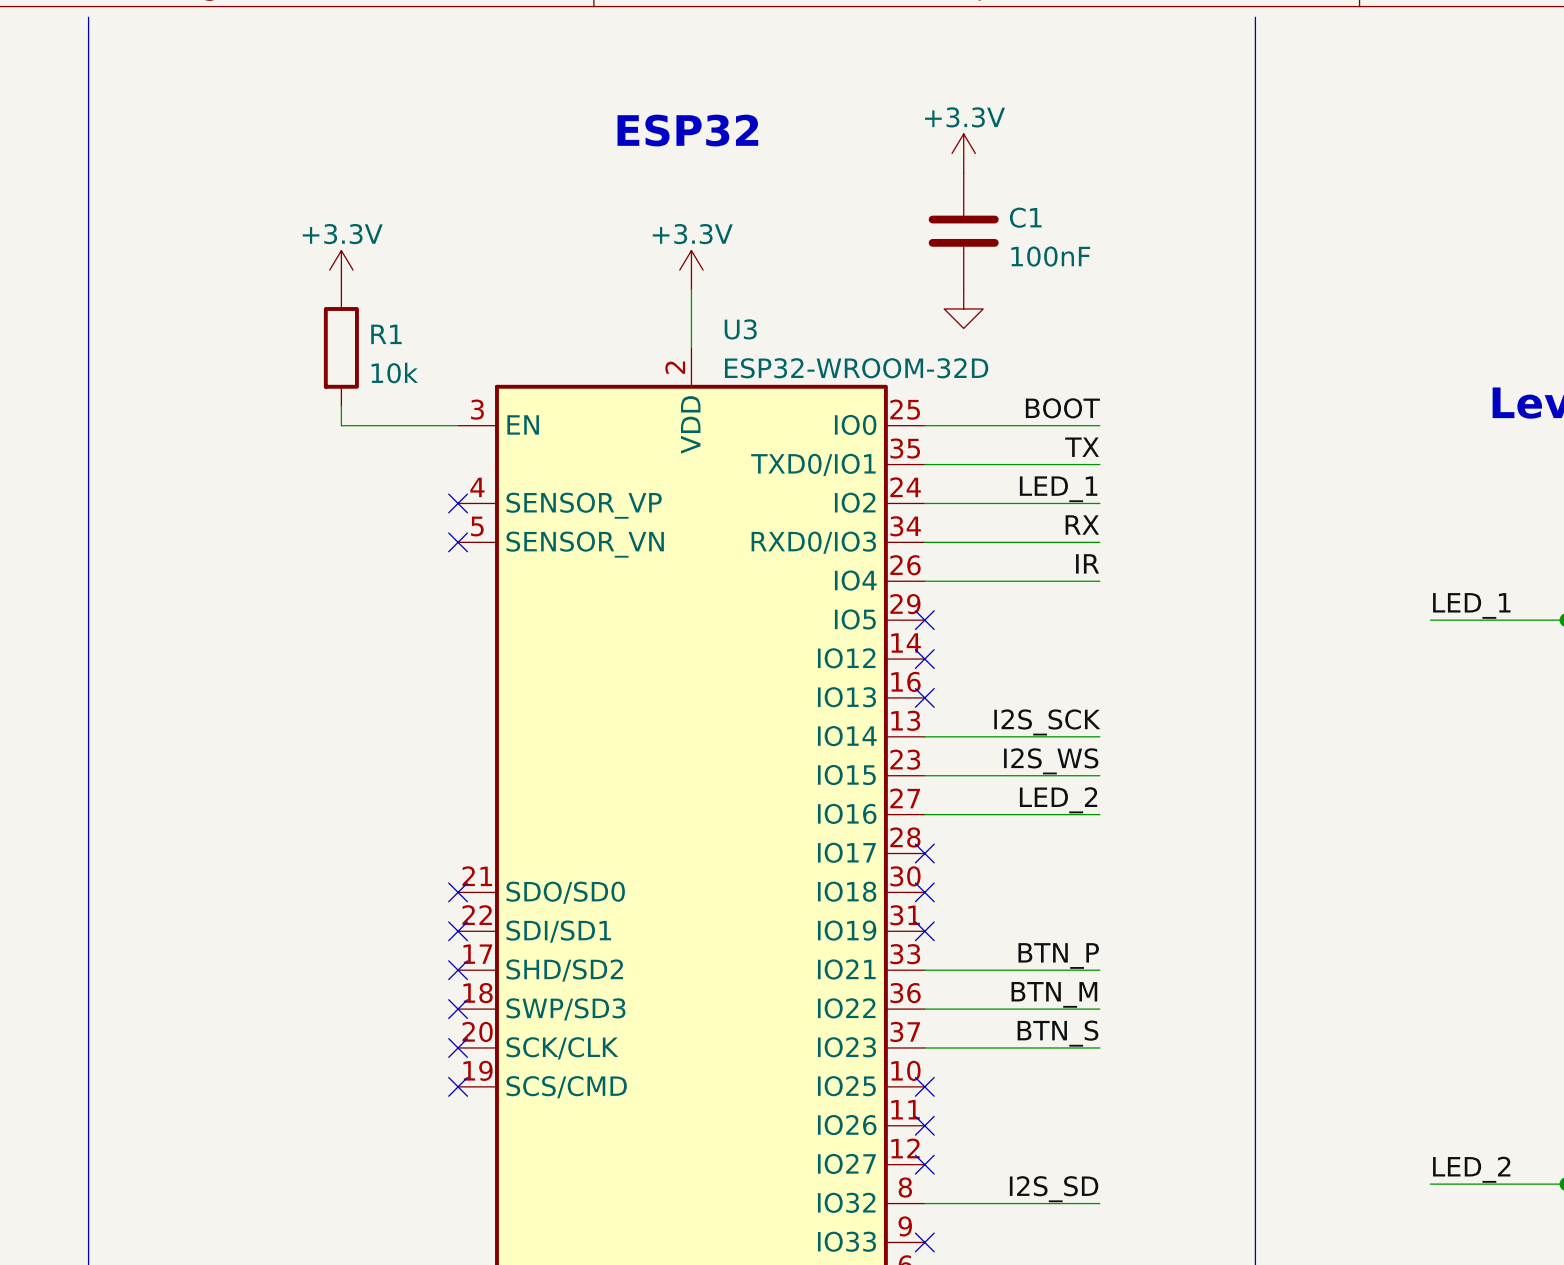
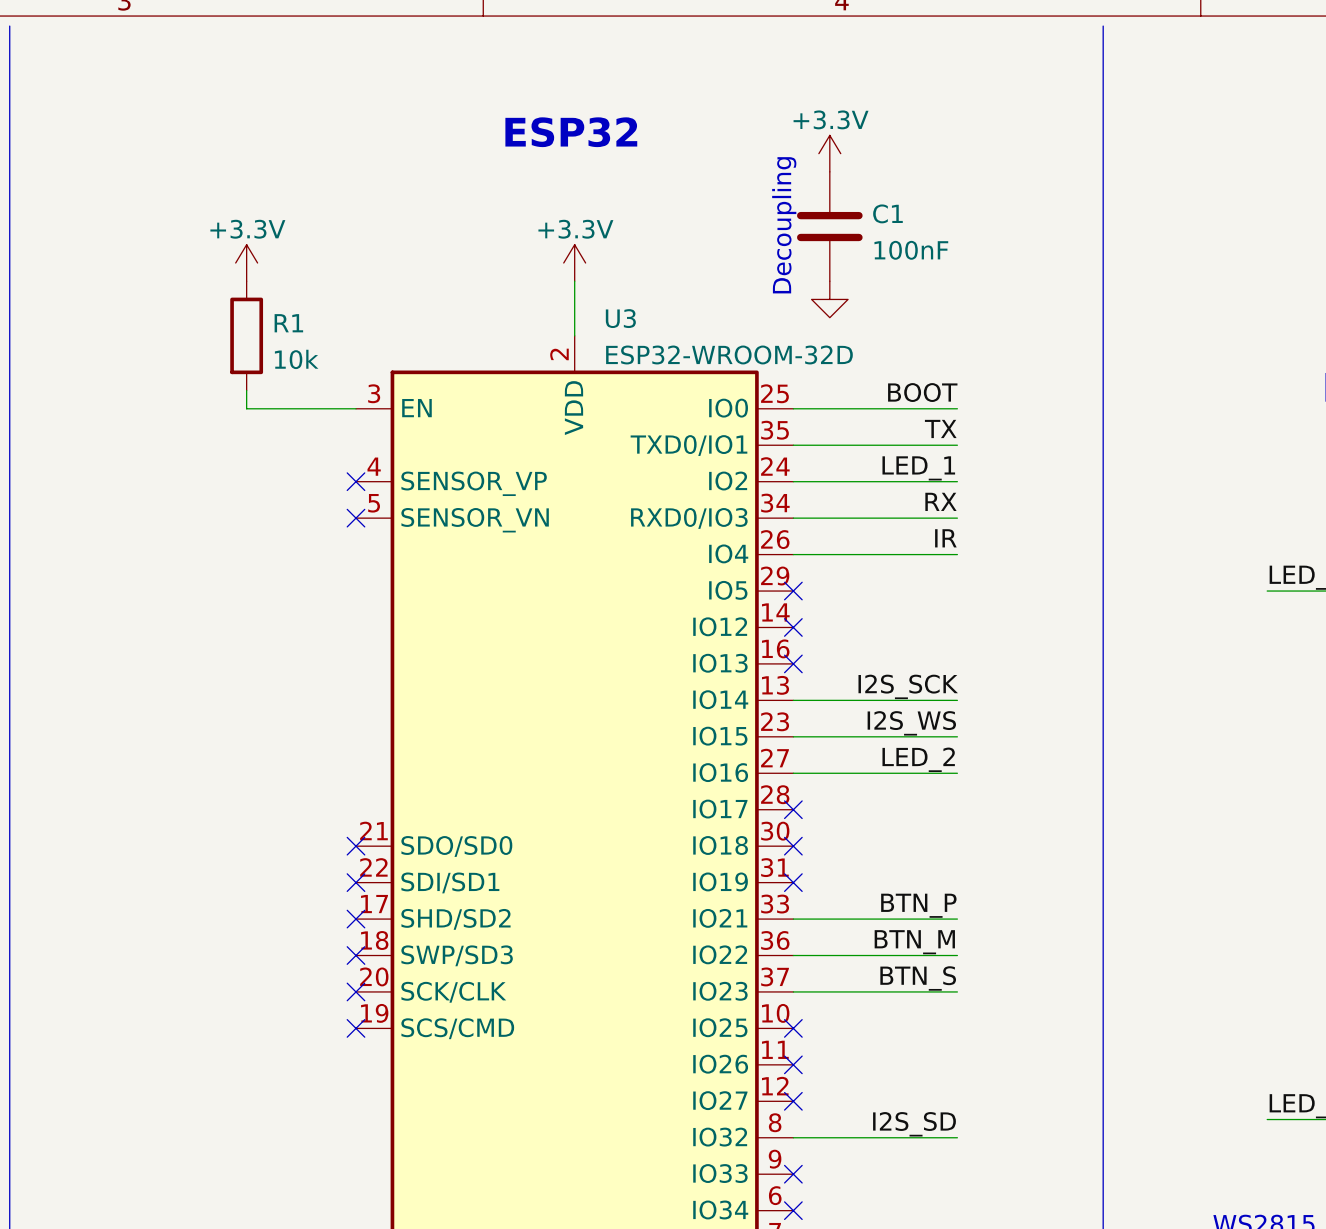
text: none -> Decoupling (784, 225)

